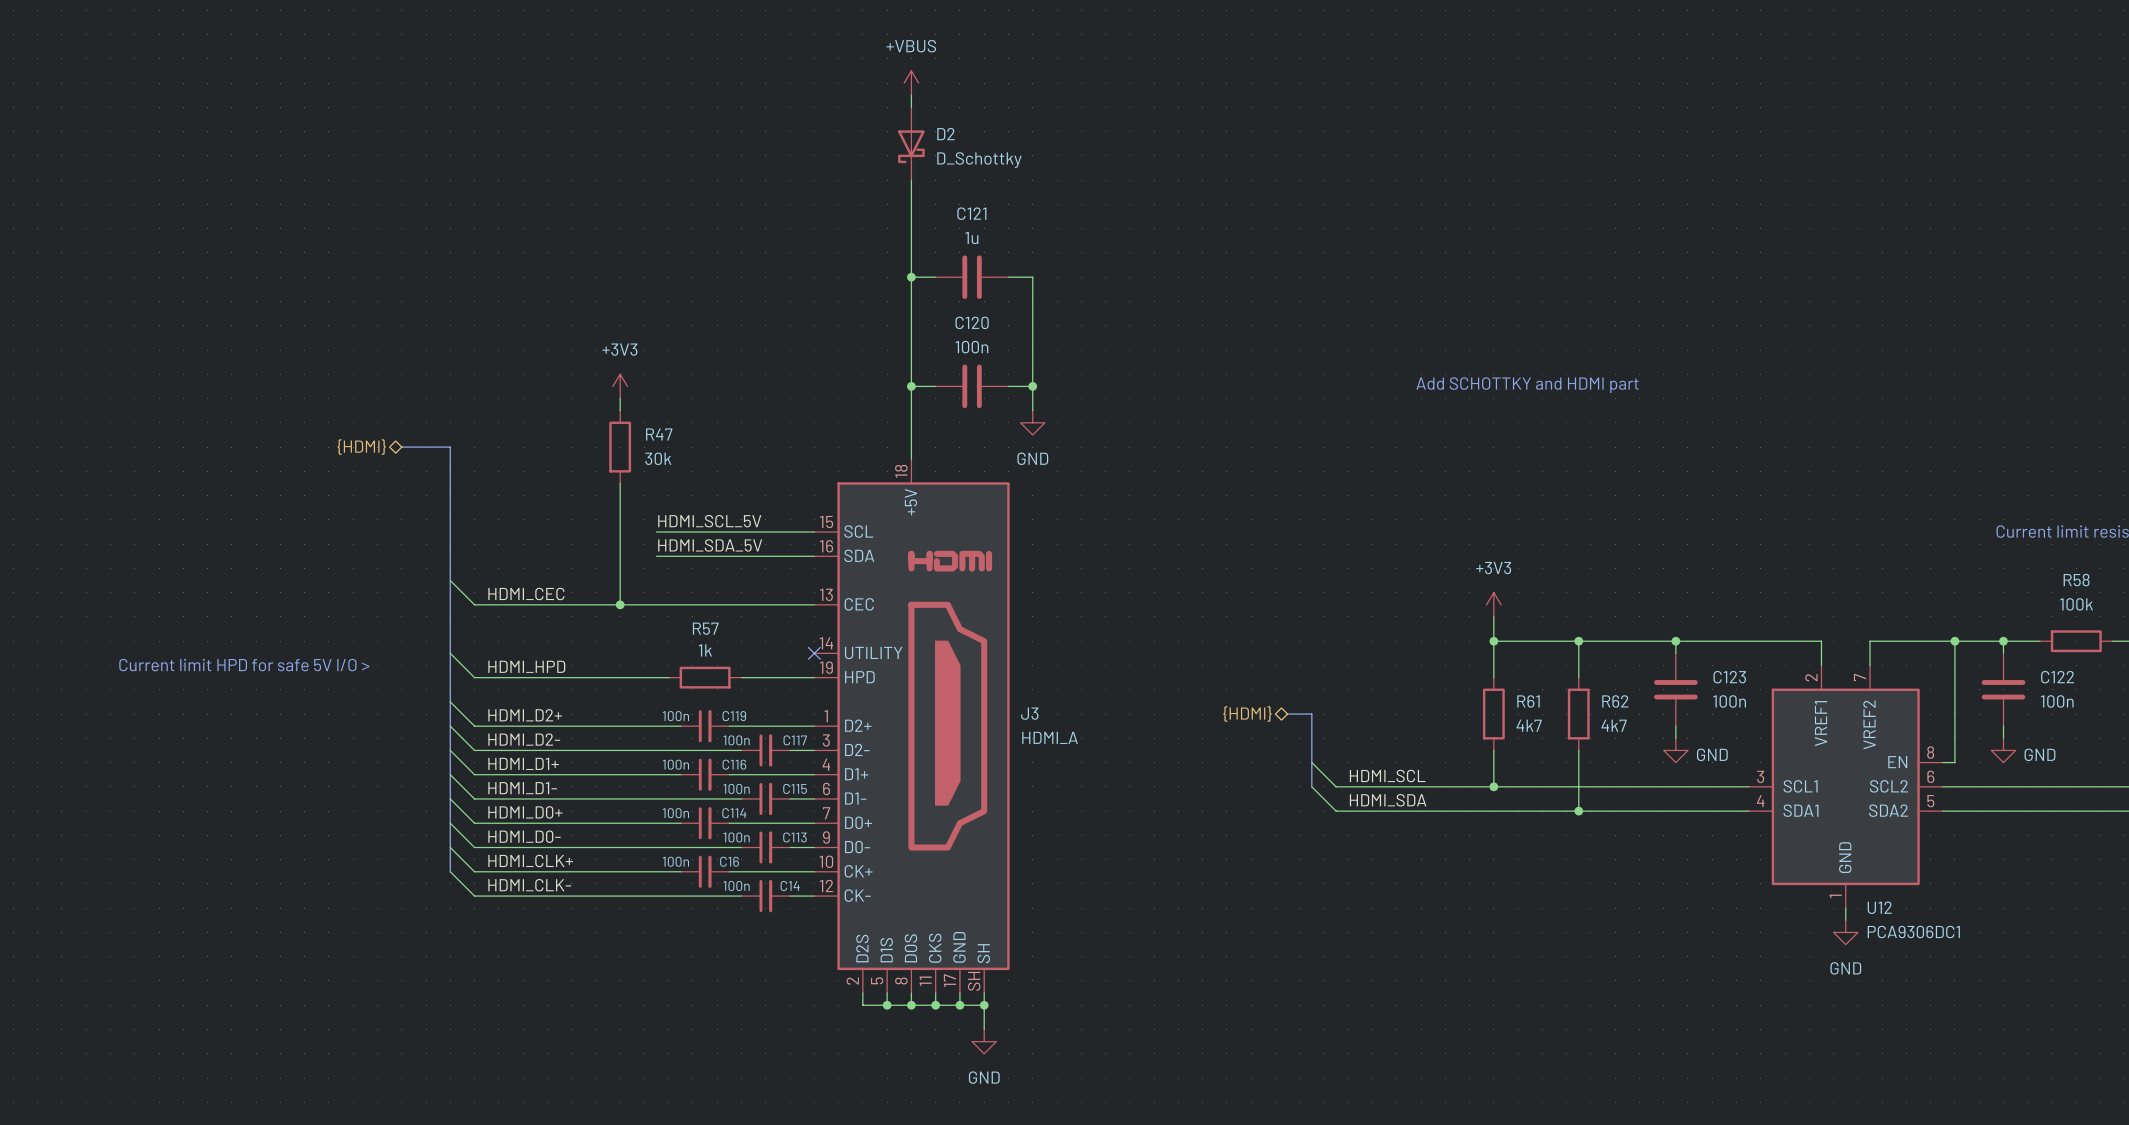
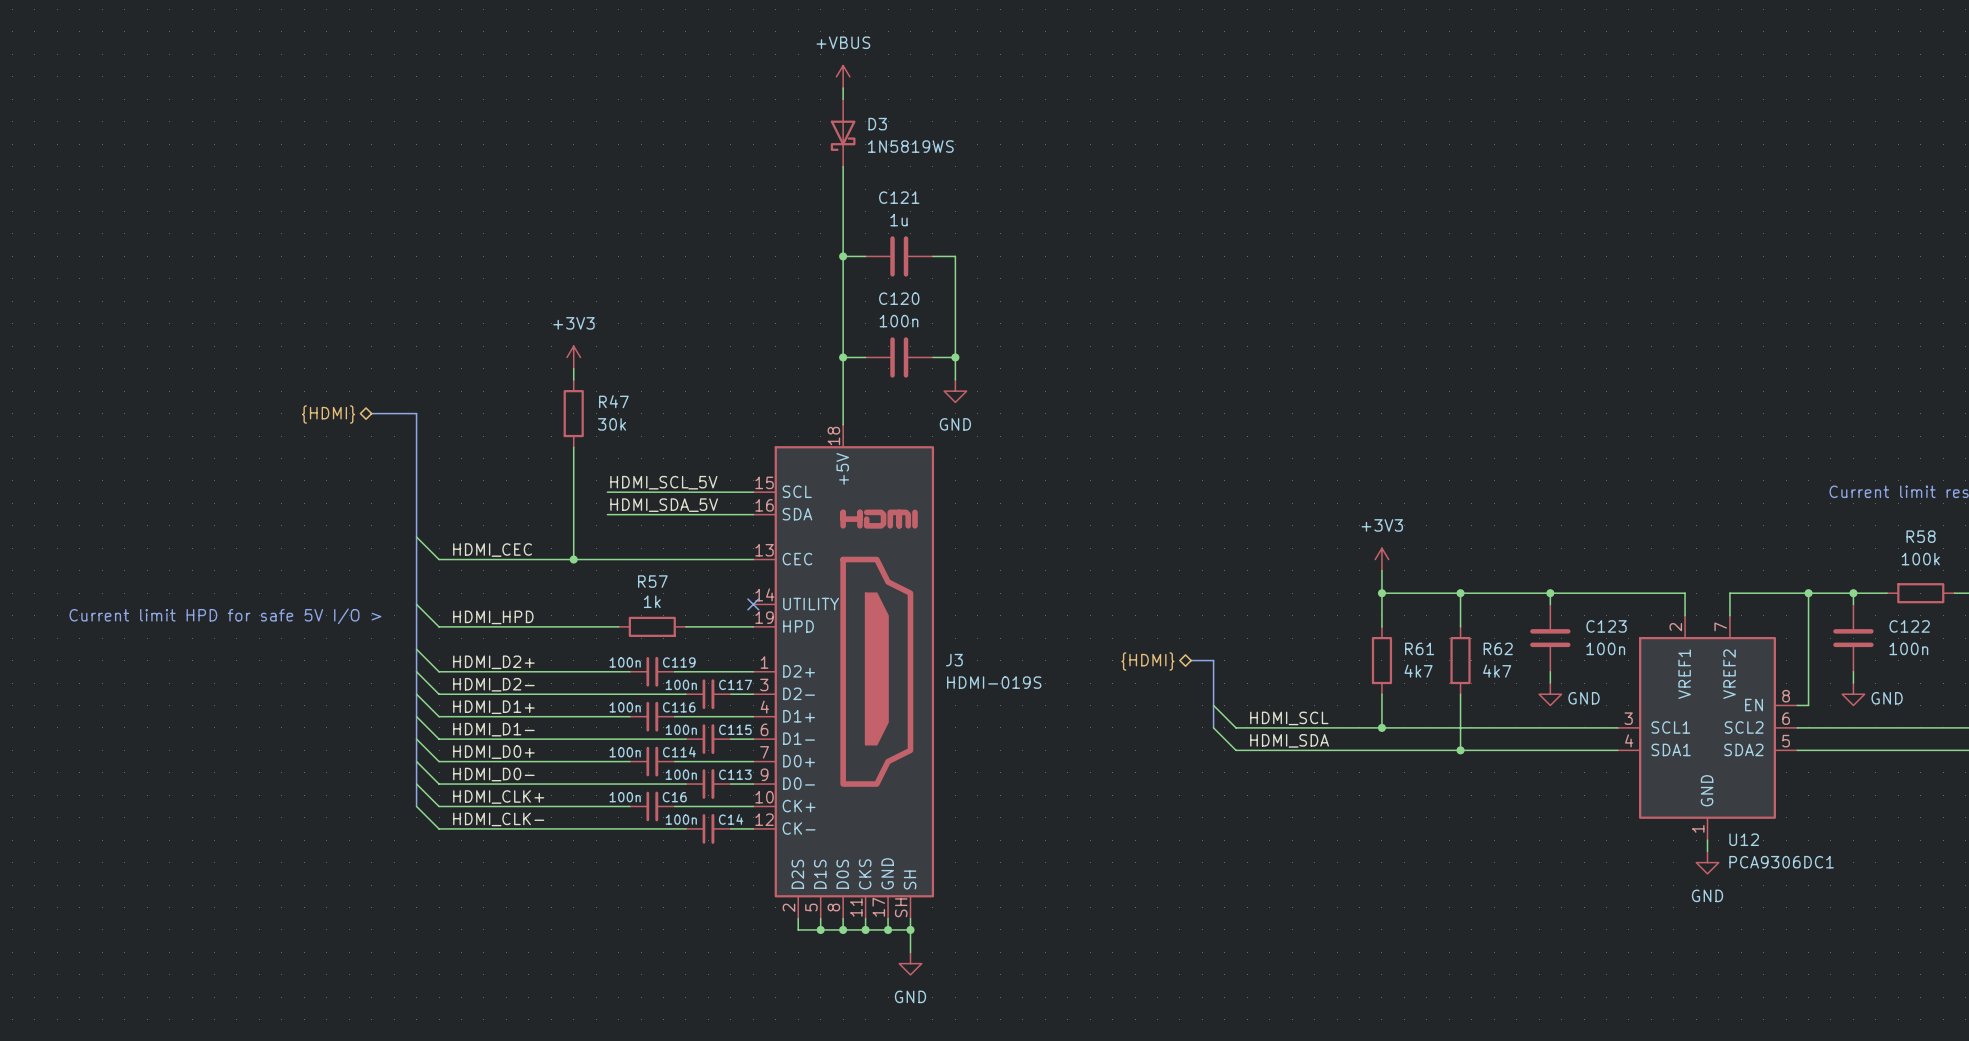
D2 name: D2 (945, 134) -> D3 (877, 124)
D2 value: D_Schottky (979, 160) -> 1N5819WS (910, 146)
text: Add SCHOTTKY and HDMI part (1527, 385) -> none
J3 value: HDMI_A (1050, 737) -> HDMI-019S (994, 682)

